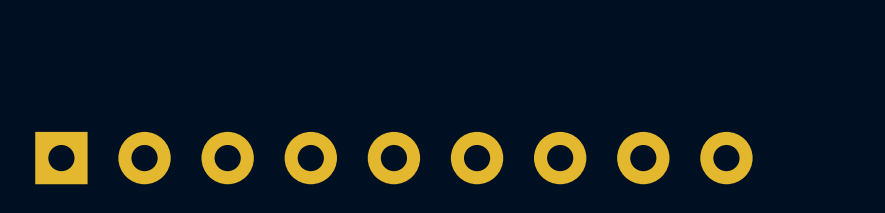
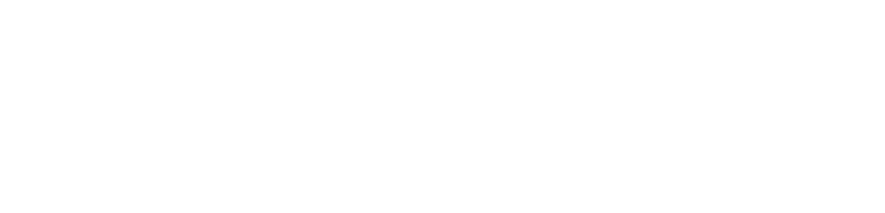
part: (393, 158) -> none

